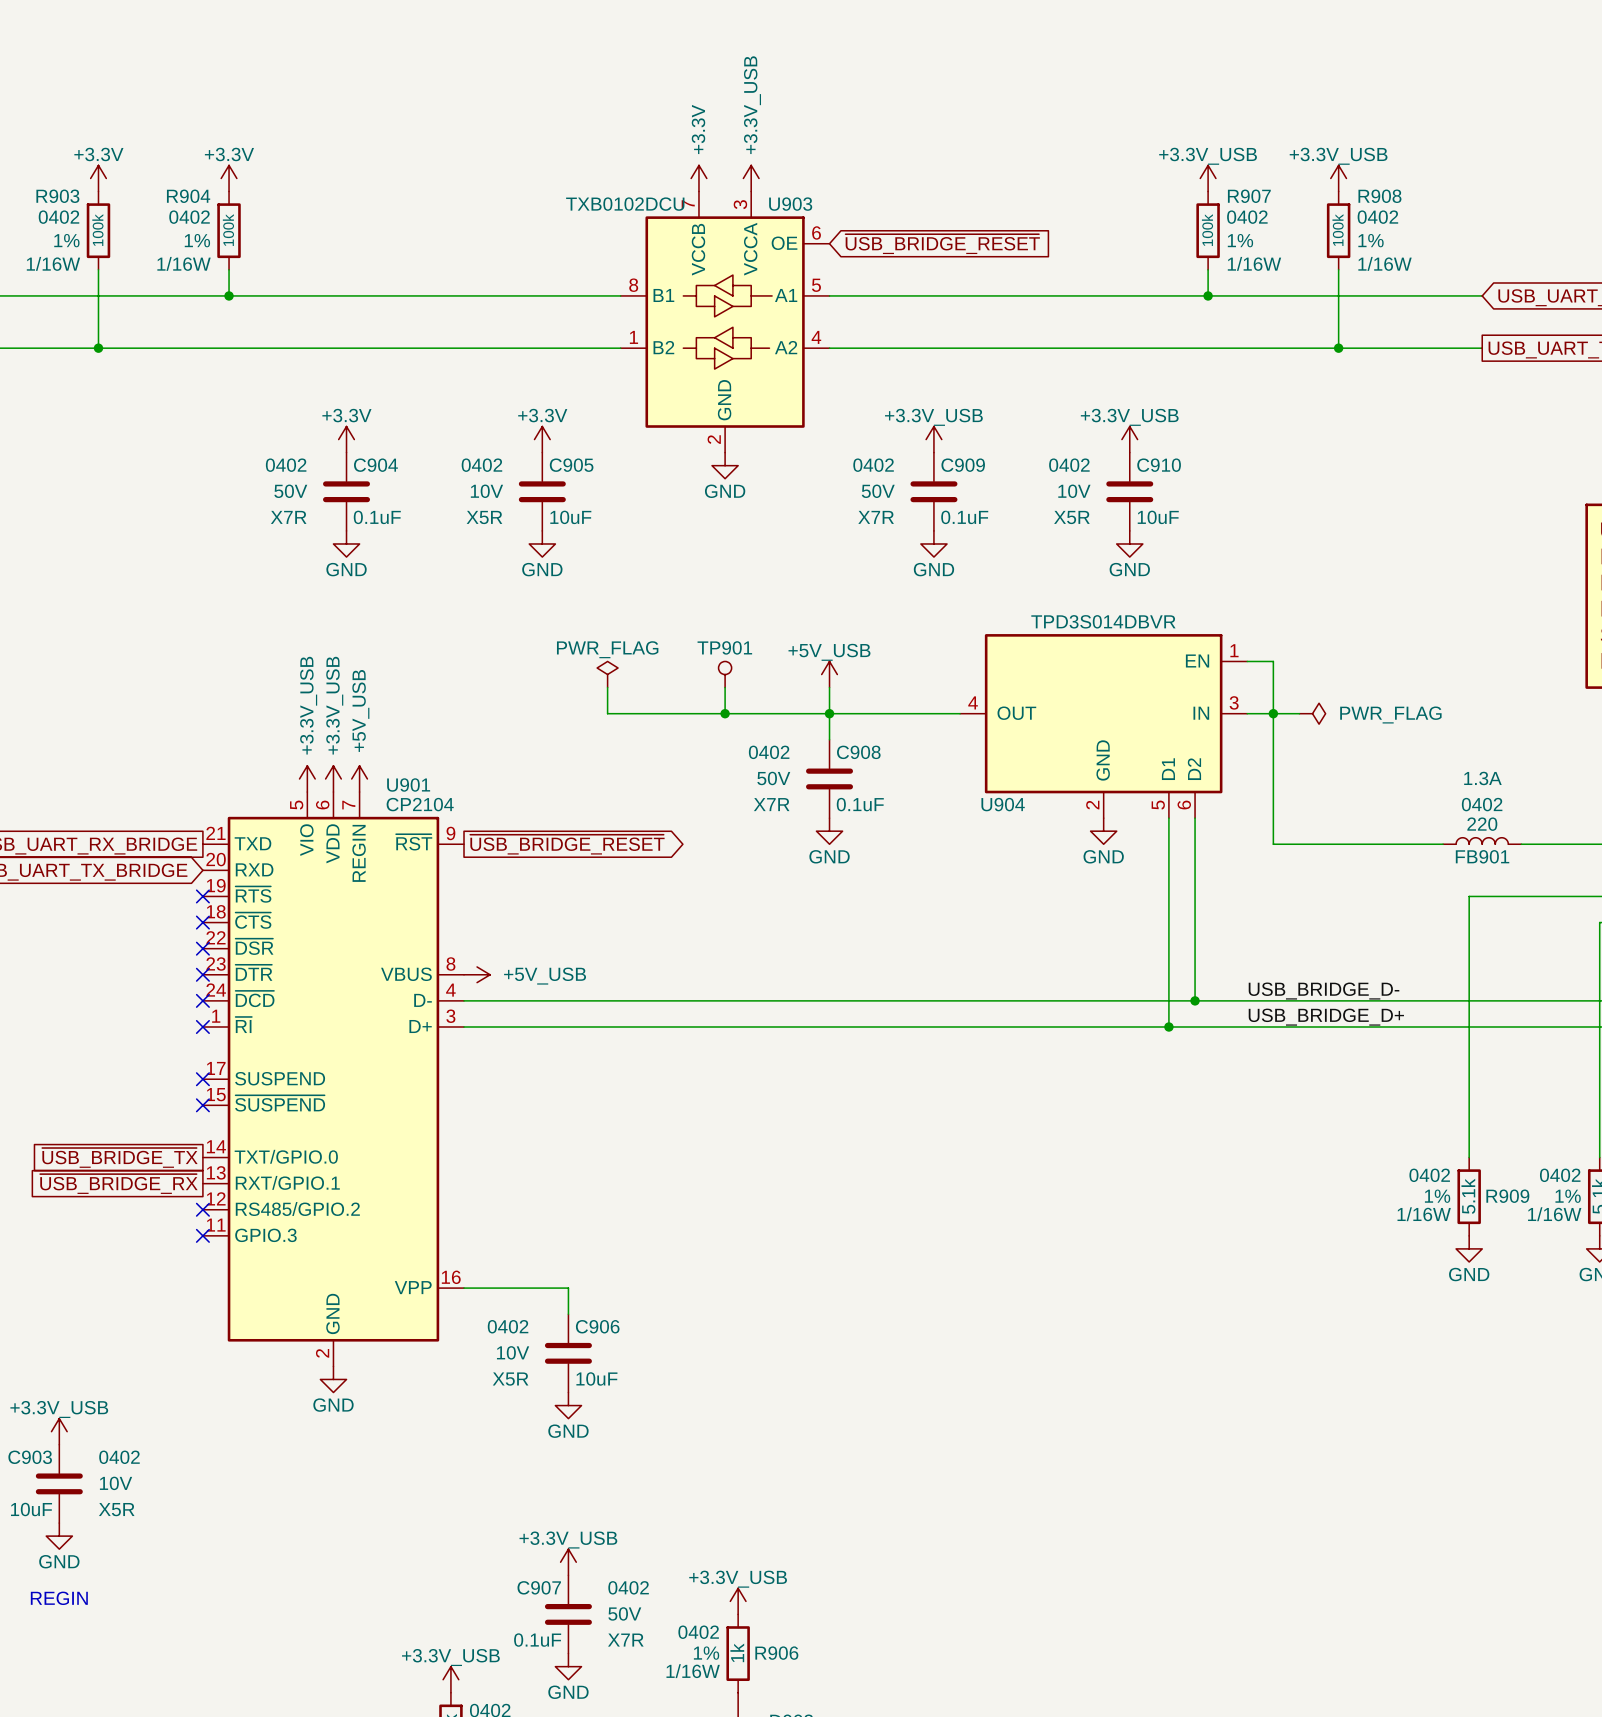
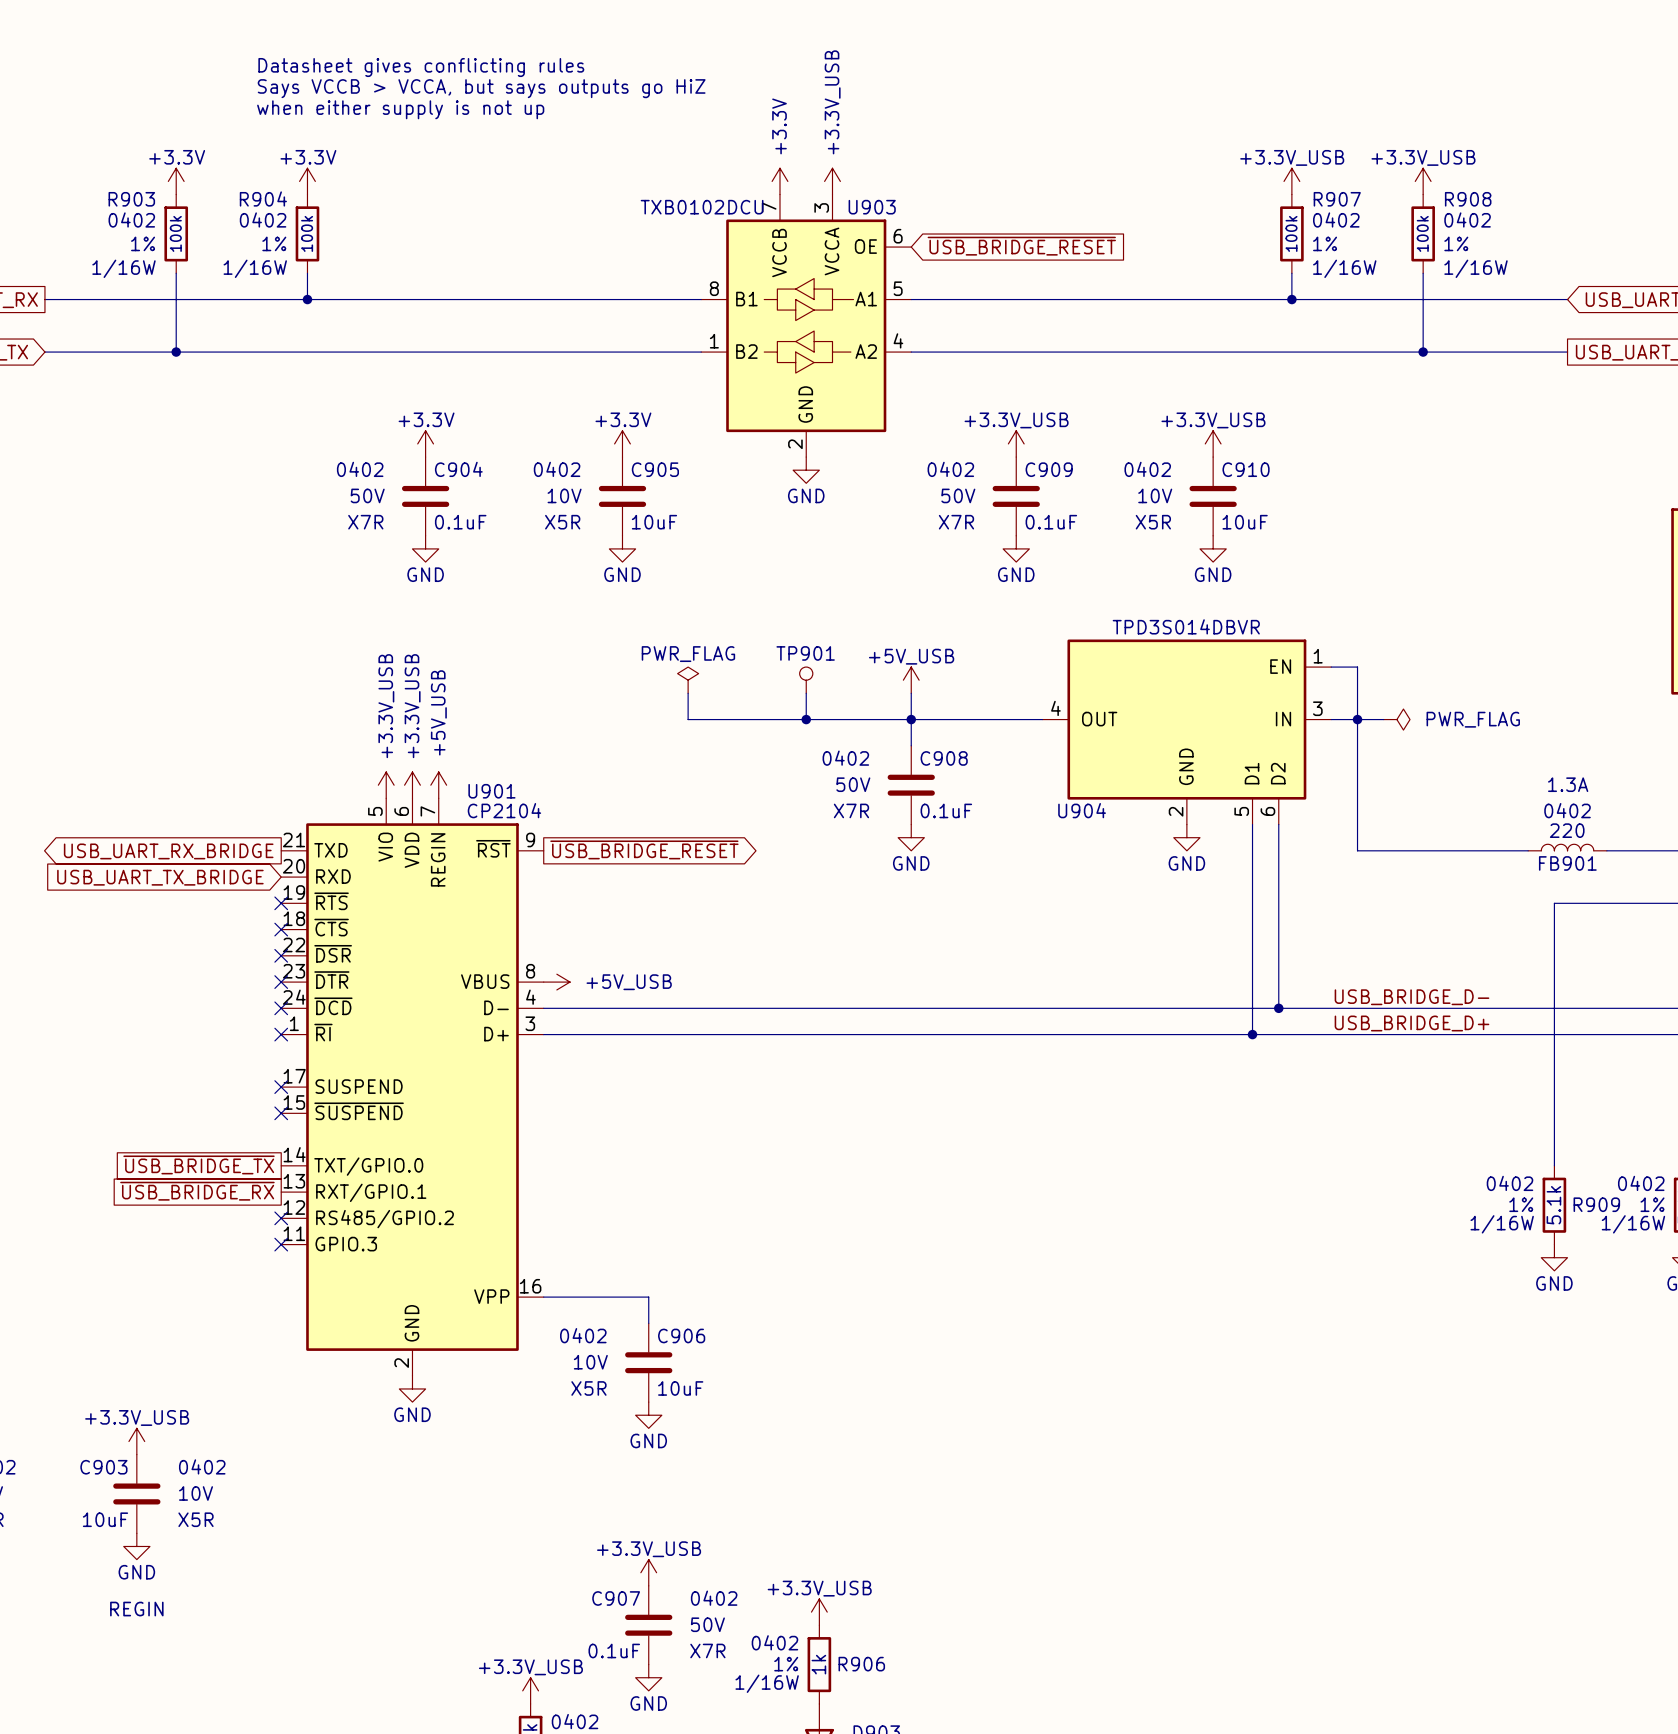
text: none -> Datasheet gives conflicting rules (421, 67)
text: none -> Says VCCB > VCCA, but says outputs go HiZ (481, 88)
text: none -> when either supply is not up (400, 109)

